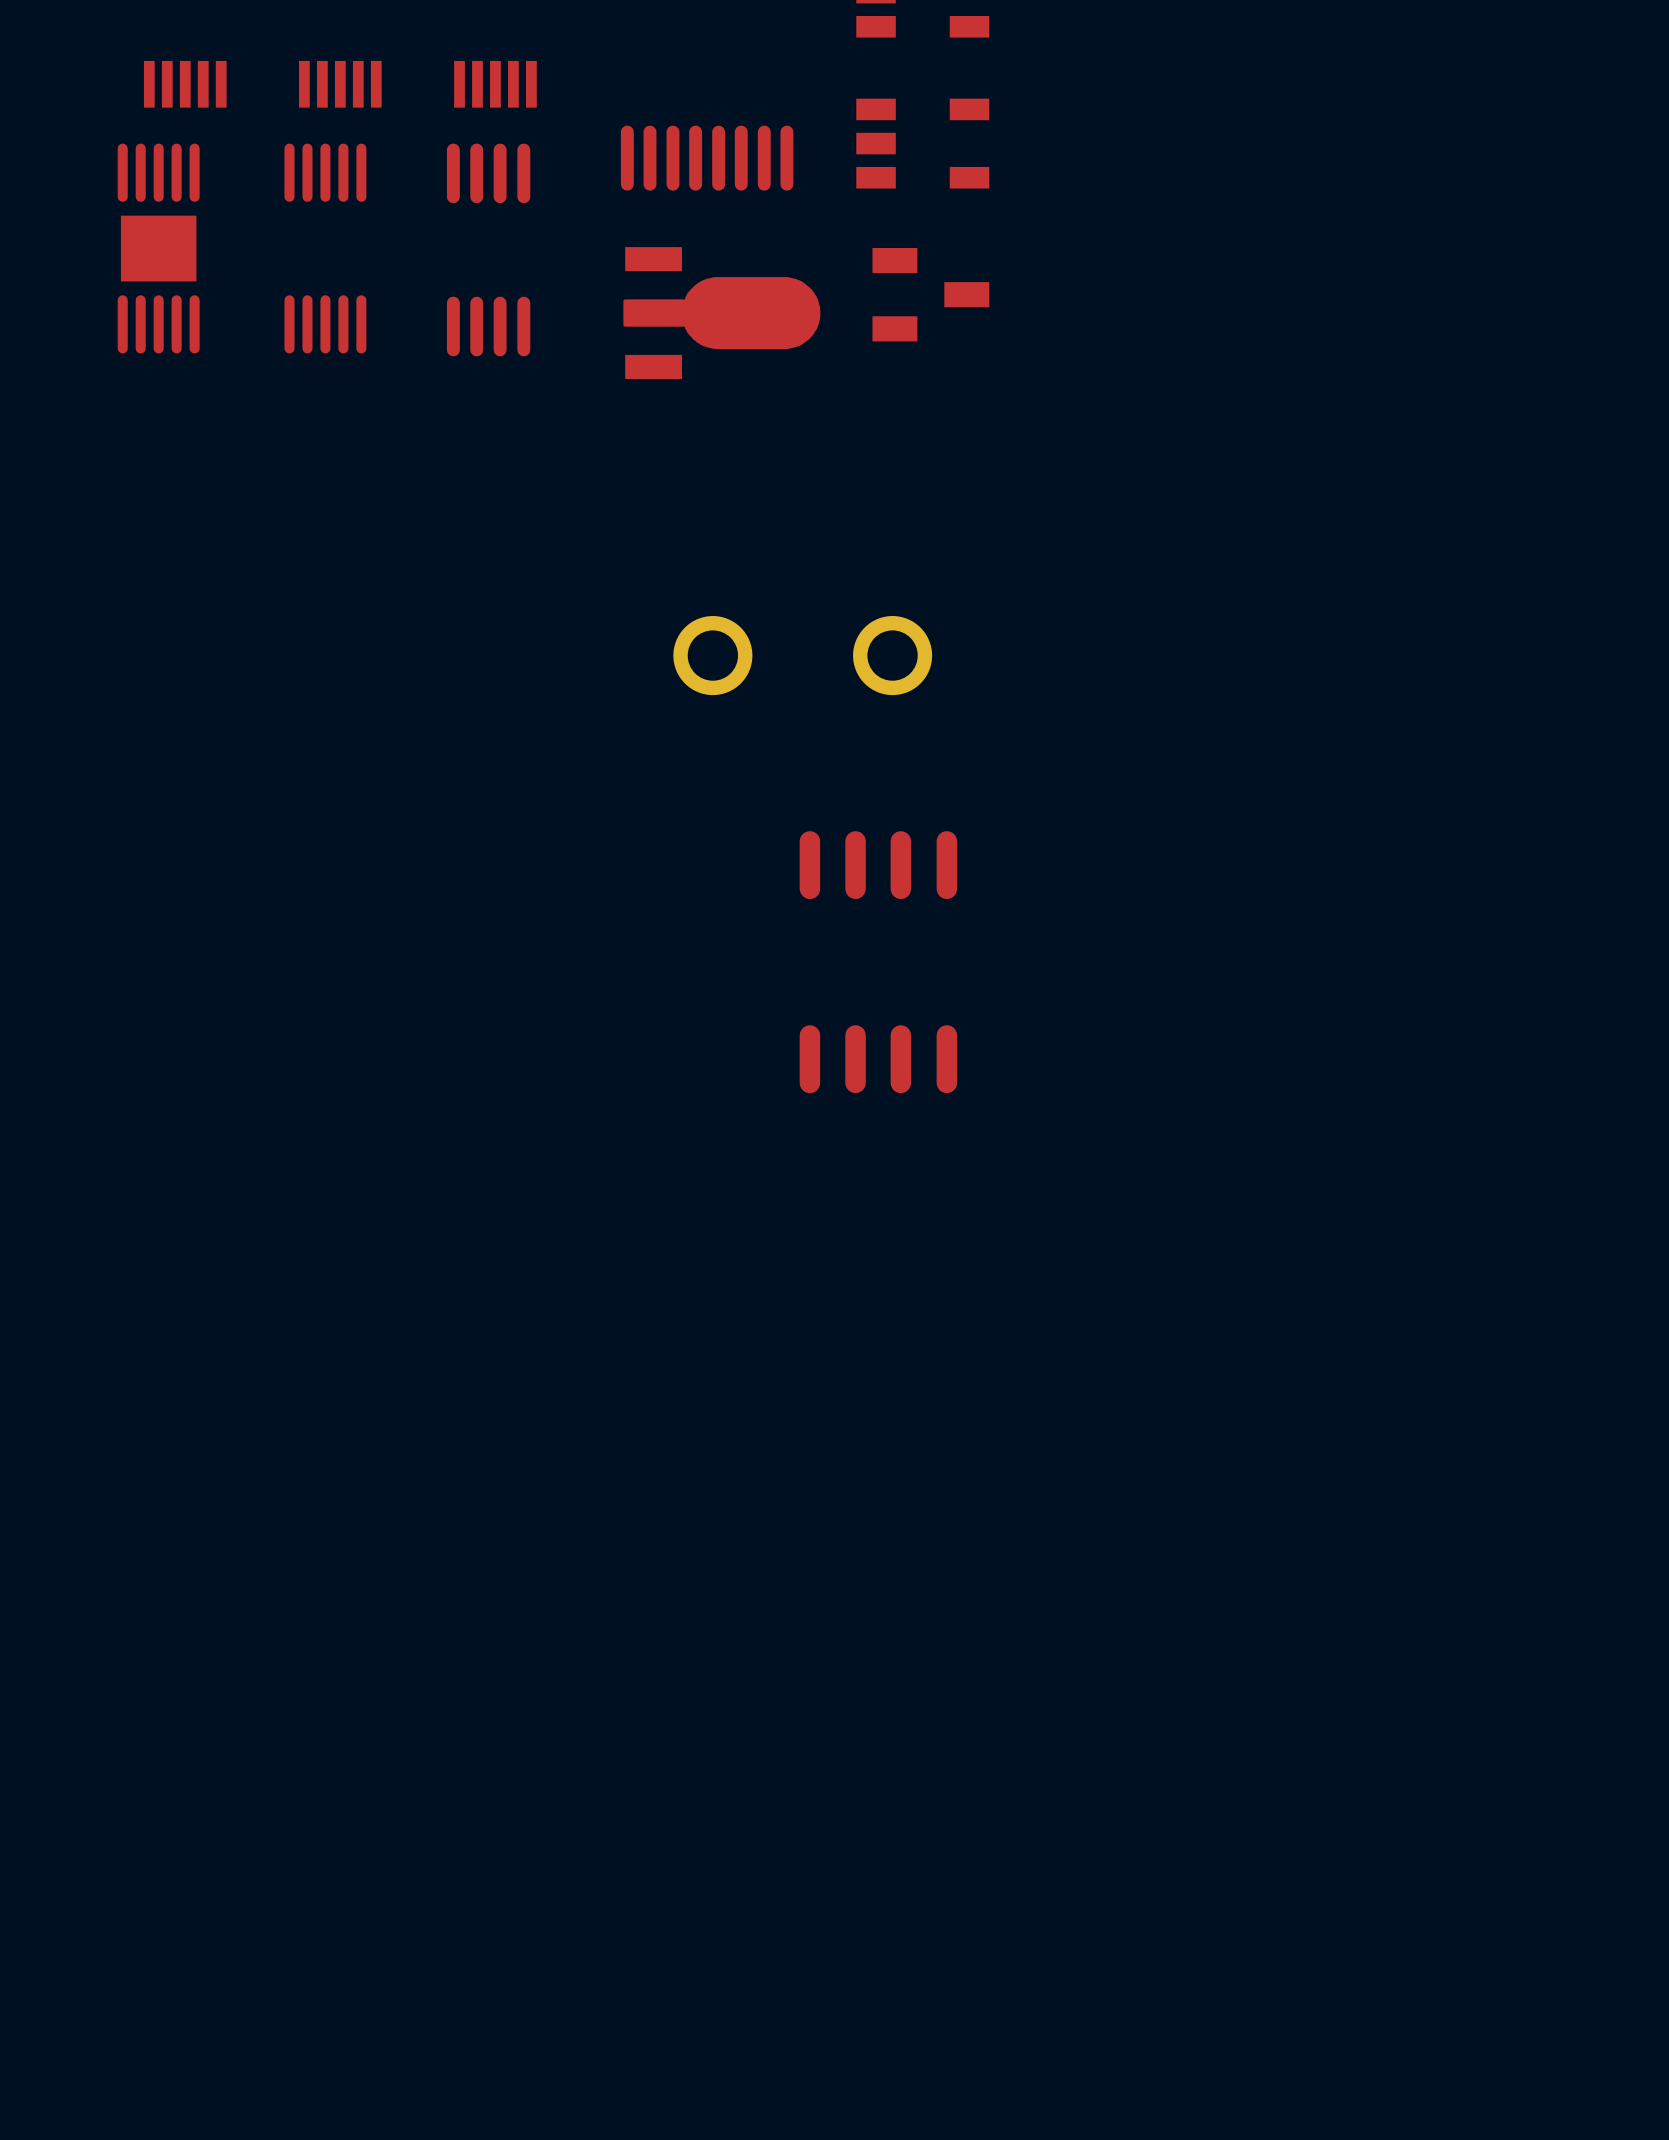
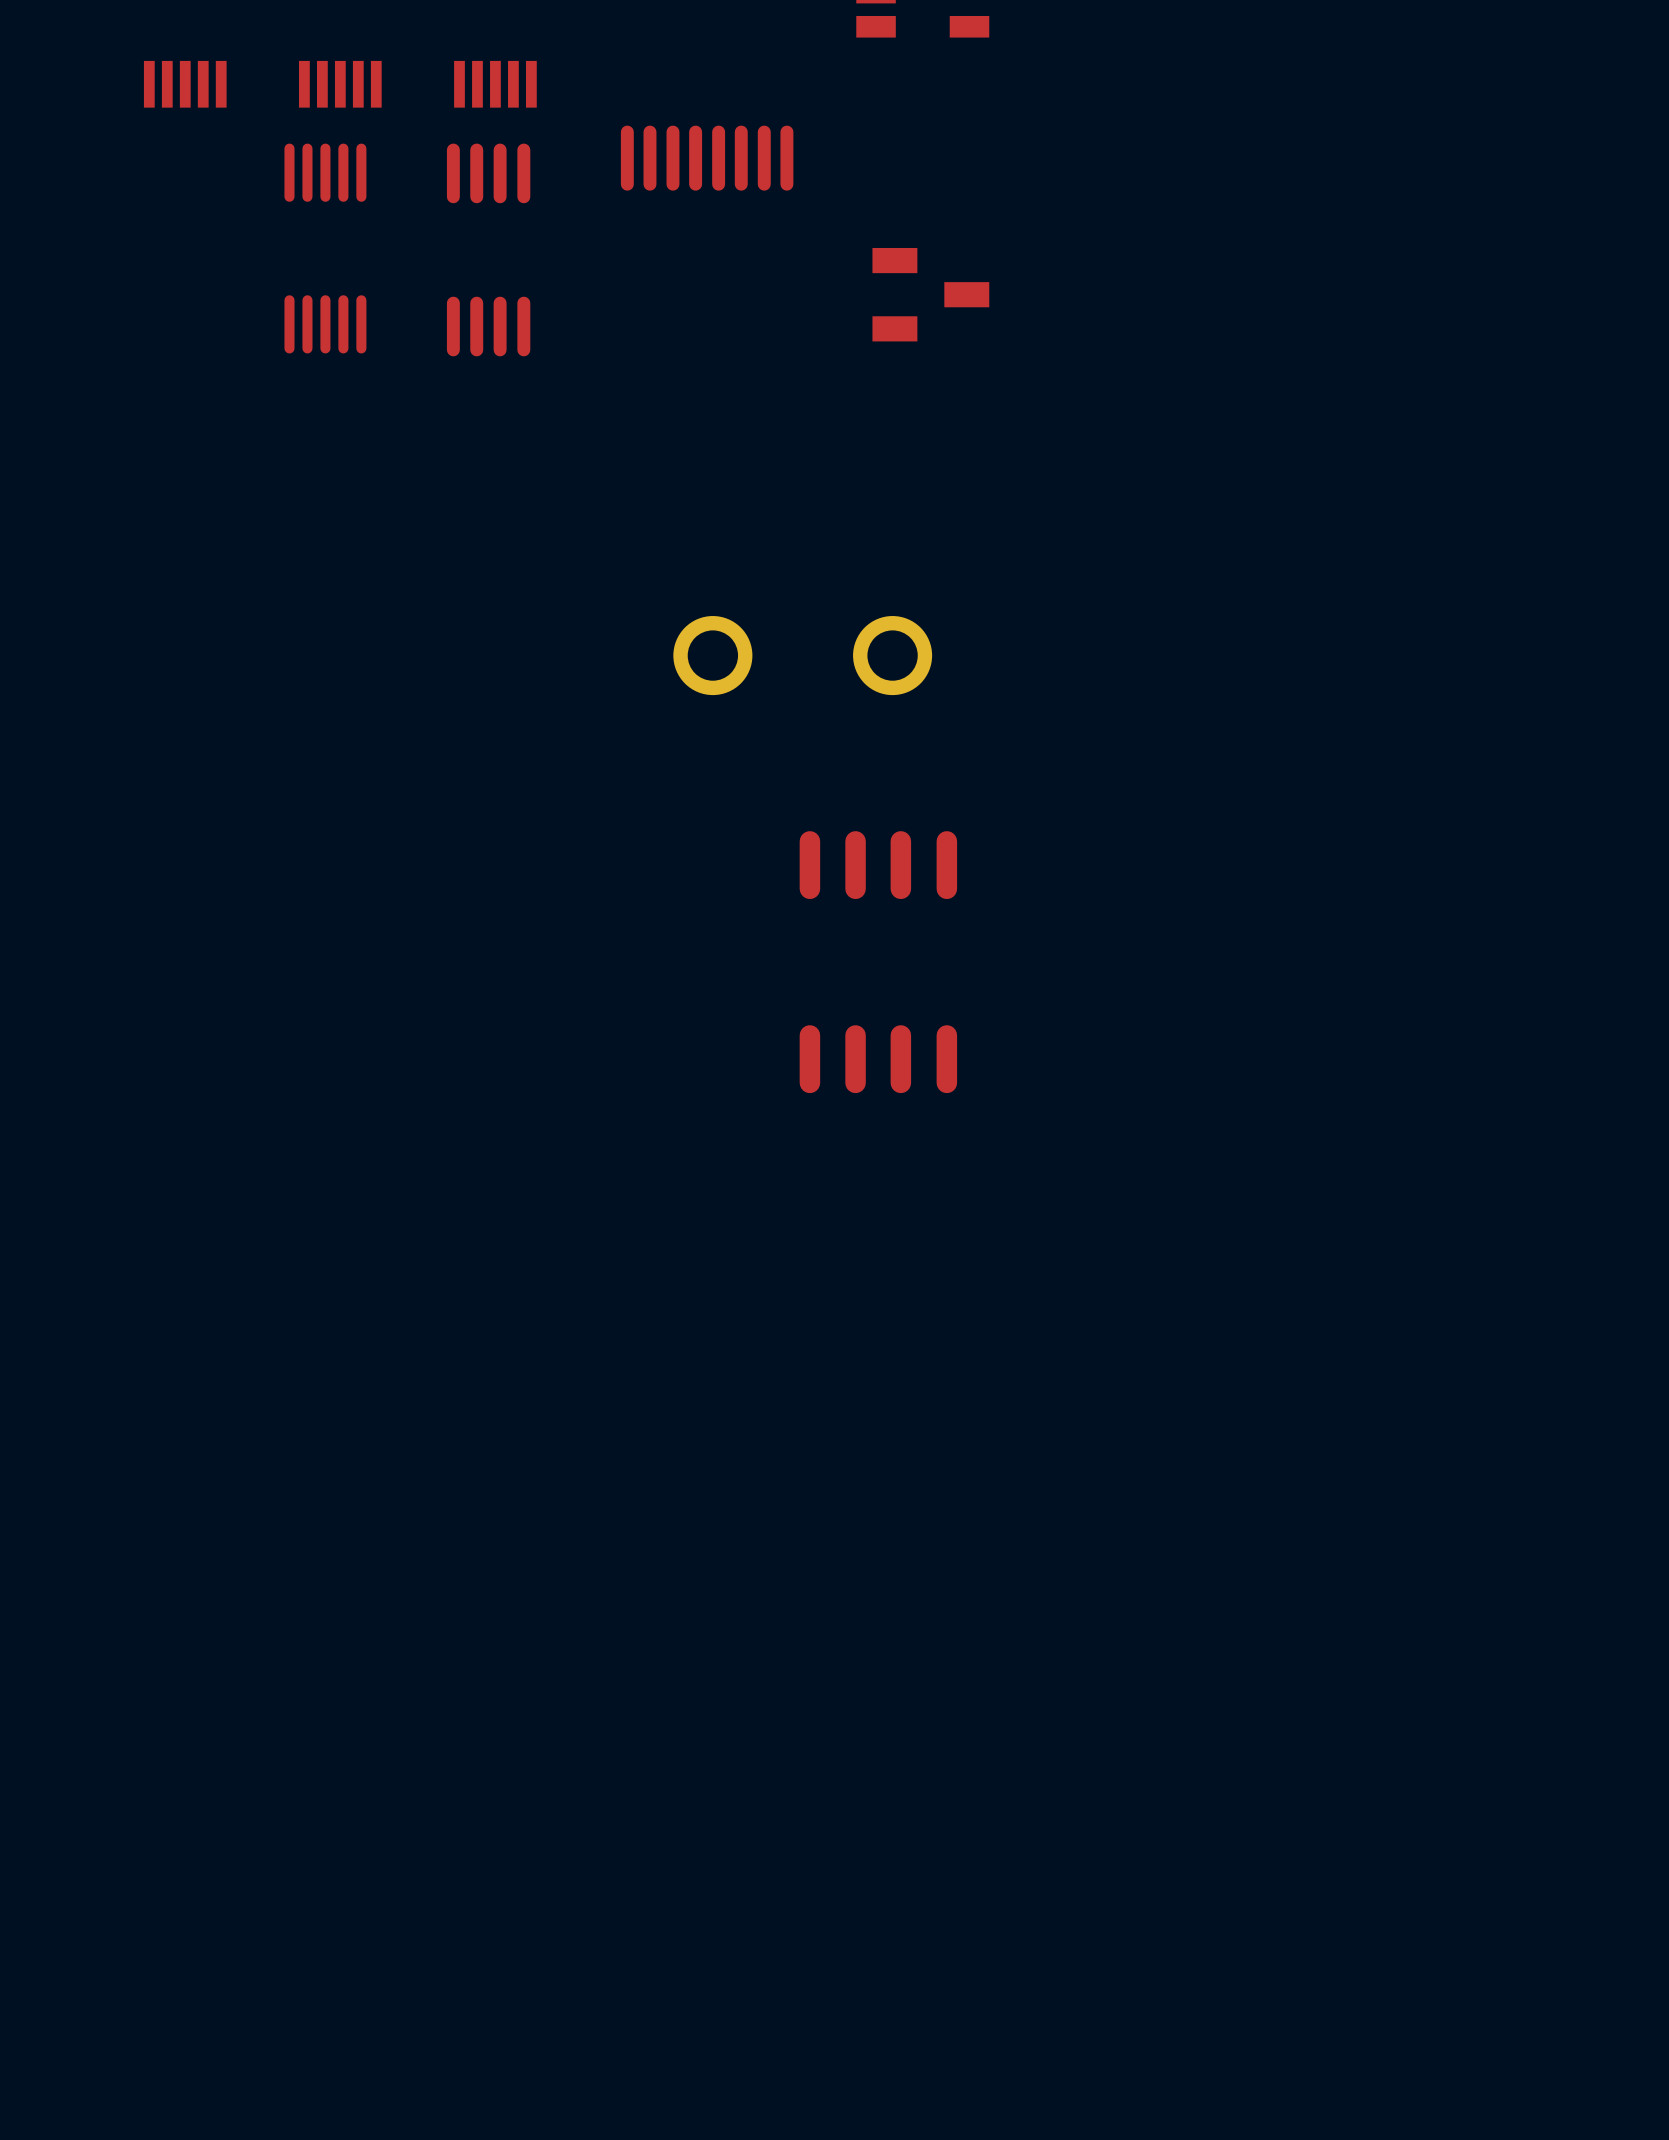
part: (922, 143) -> none
part: (158, 248) -> none
part: (721, 313) -> none

